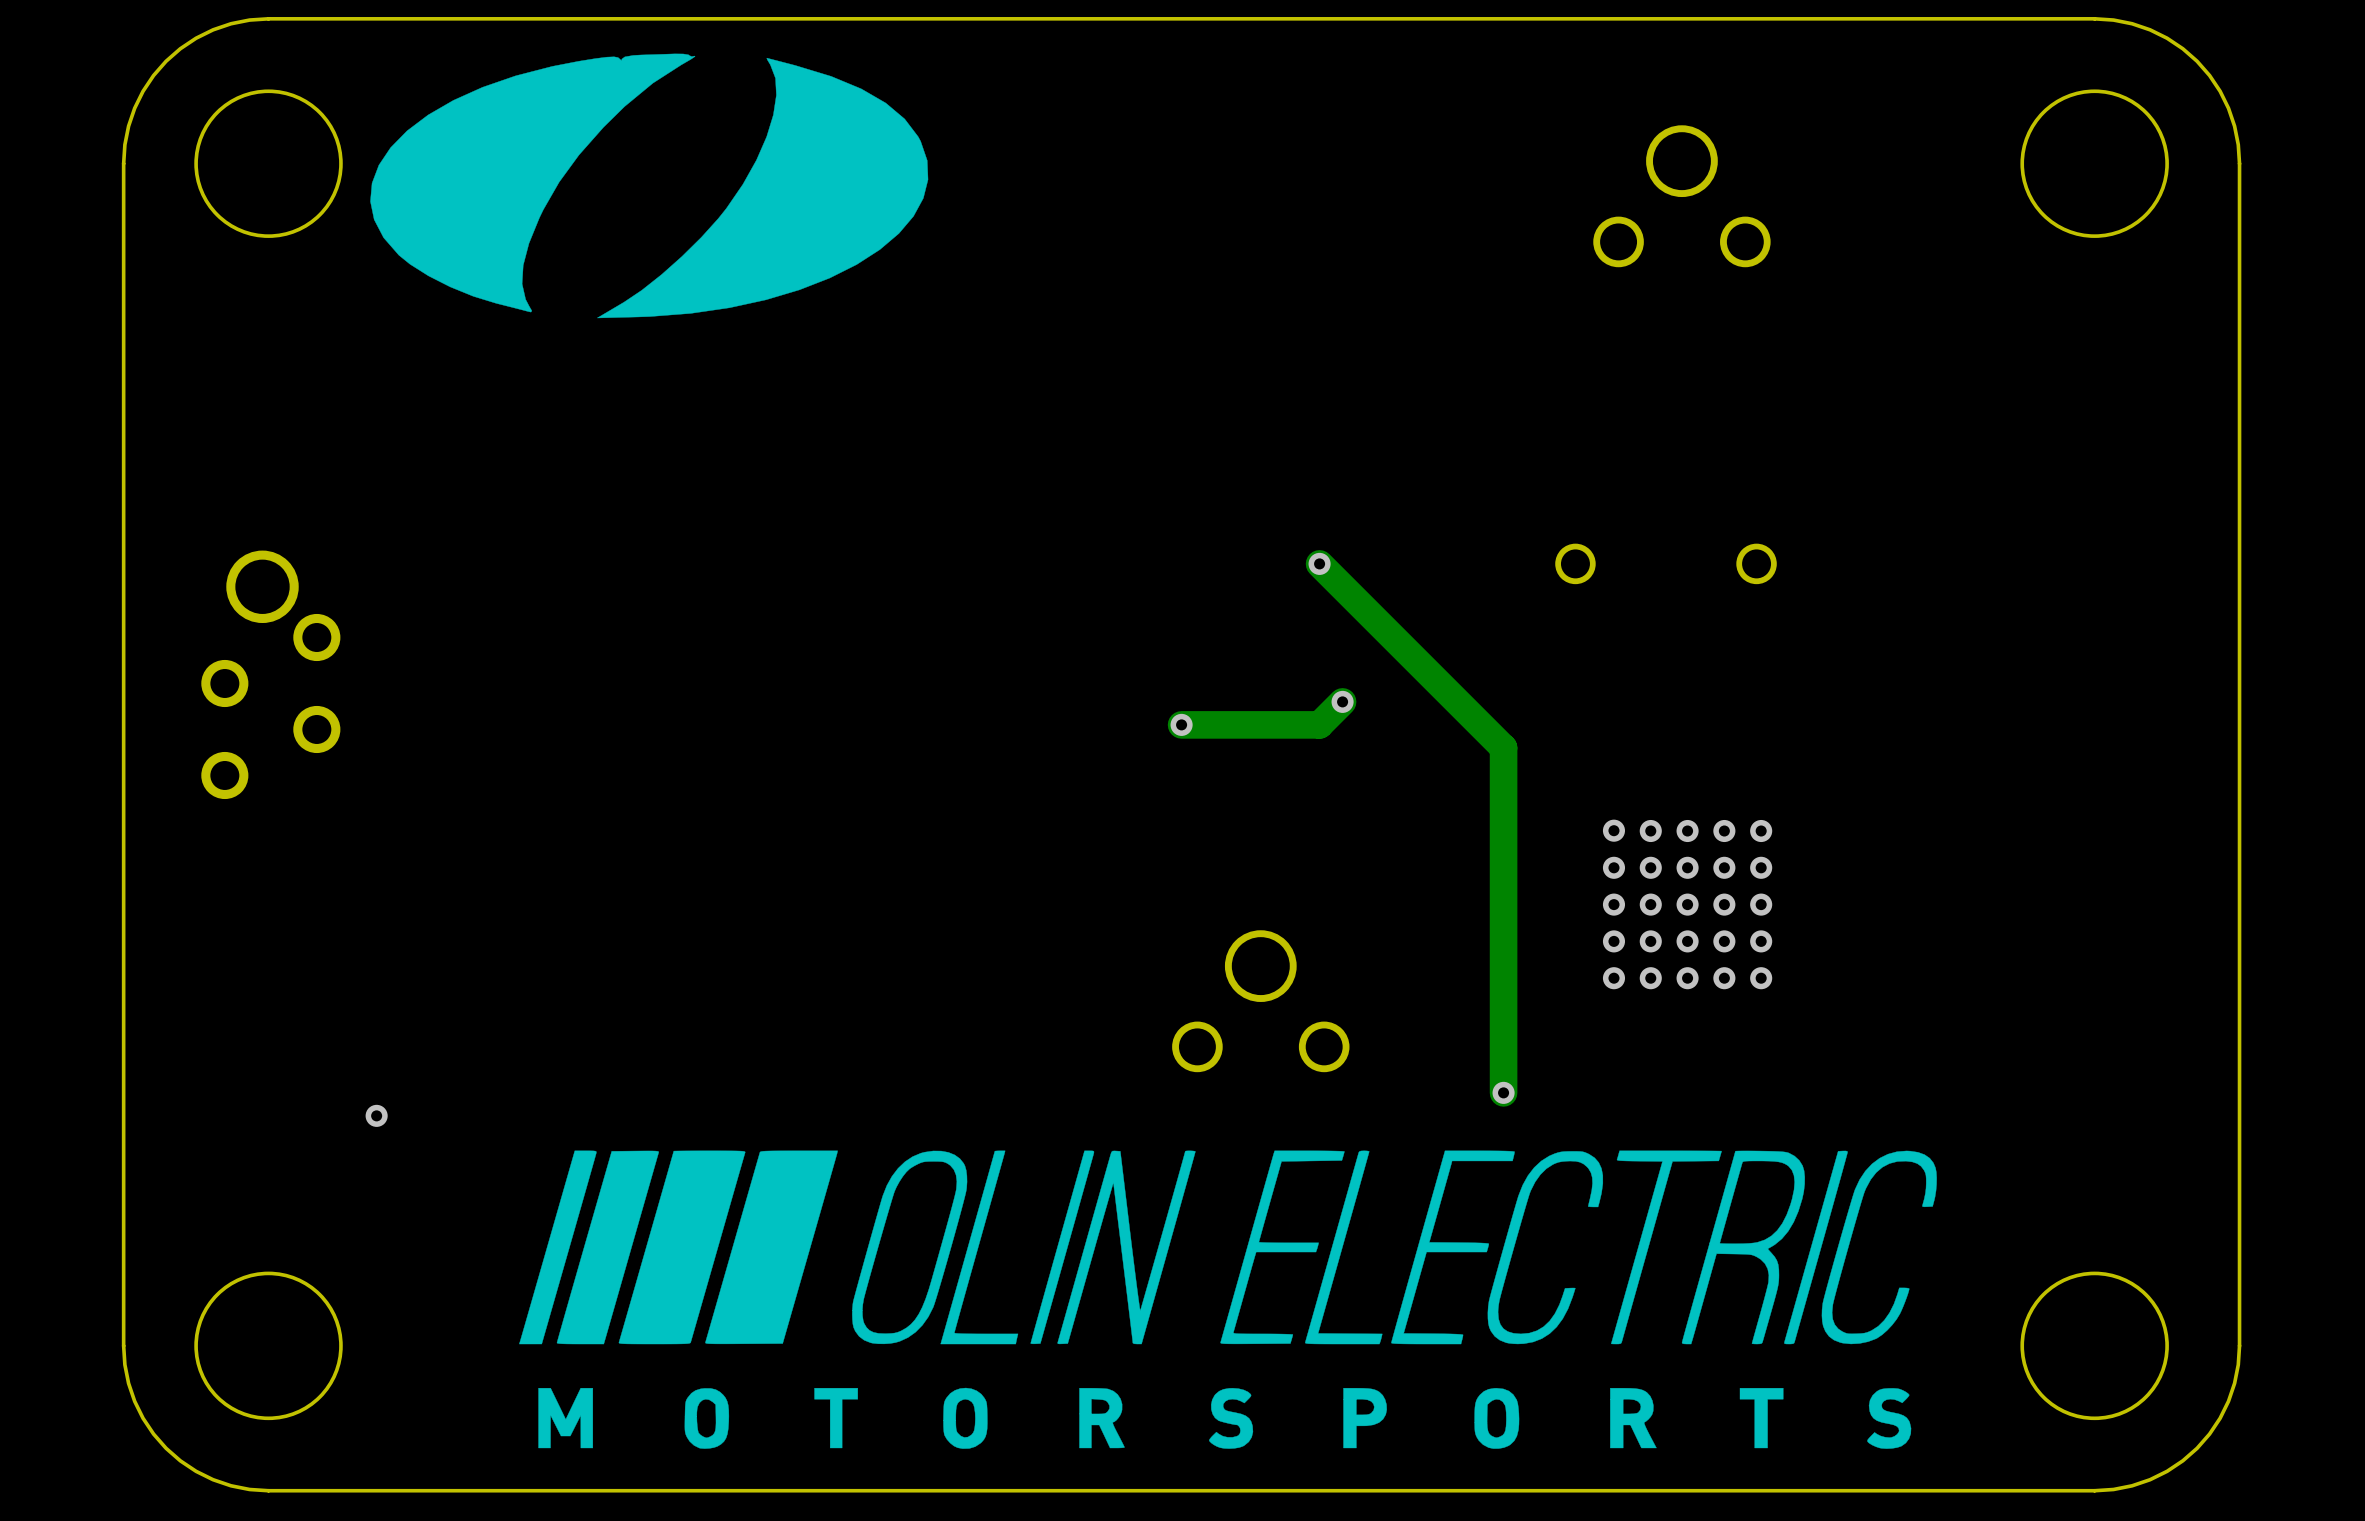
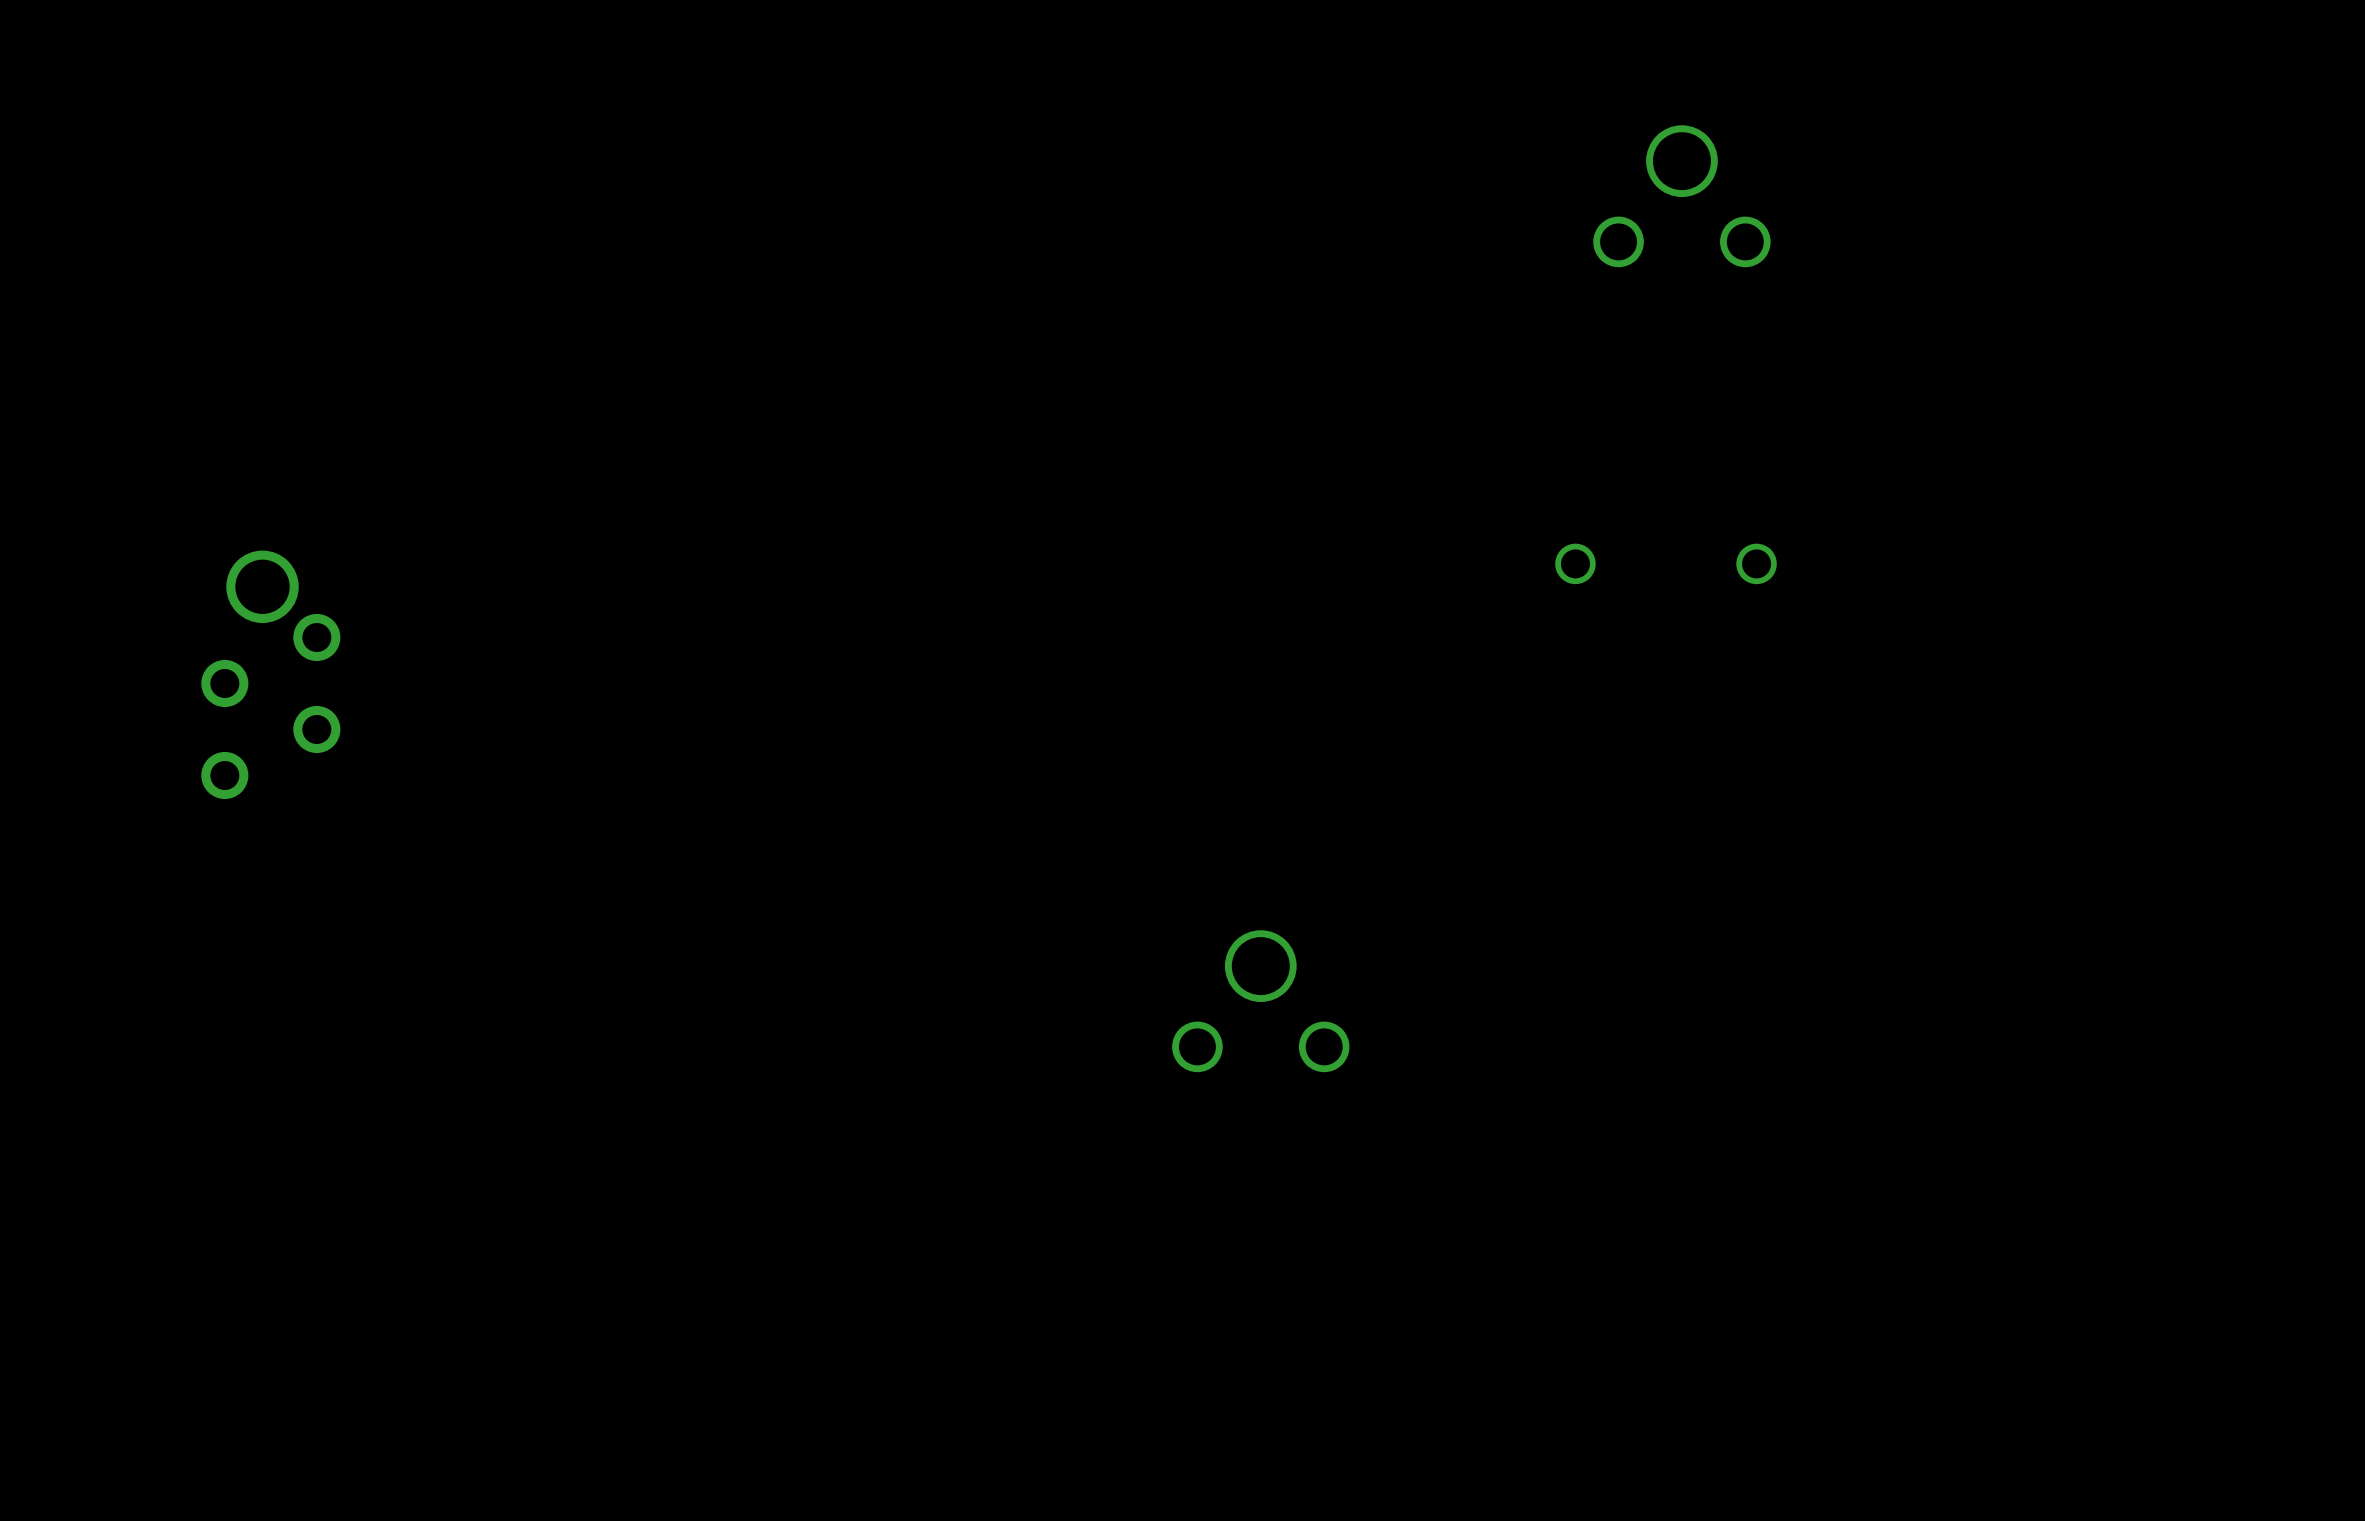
board edge: (2094, 18) (268, 18) (249, 20) (213, 29) (180, 48) (153, 75) (134, 108) (128, 126) (123, 163) (123, 1345) (128, 1383) (143, 1418) (153, 1434) (180, 1460) (213, 1479) (231, 1485) (268, 1490) (2094, 1490) (2132, 1485) (2167, 1471) (2182, 1460) (2209, 1434) (2228, 1401) (2238, 1364) (2239, 1345) (2239, 163) (2238, 144) (2228, 108) (2209, 75) (2197, 61) (2182, 48) (2150, 29) (2113, 20) (2094, 18) -> none
drawing: [370, 53, 929, 319] -> none
round board edge: [194, 89, 343, 238] -> none
round board edge: [2020, 89, 2169, 238] -> none
track: (1319, 563) (1503, 747) (1503, 1092) -> none
via: (1319, 563) -> none
track: (1342, 701) (1319, 724) (1181, 724) -> none
via: (1342, 701) -> none
via: (1181, 724) -> none
via: (1613, 830) -> none
via: (1650, 831) -> none
via: (1687, 831) -> none
via: (1724, 831) -> none
via: (1761, 831) -> none
via: (1613, 867) -> none
via: (1650, 867) -> none
via: (1687, 867) -> none
via: (1724, 867) -> none
via: (1761, 867) -> none
via: (1613, 904) -> none
via: (1650, 904) -> none
via: (1687, 904) -> none
via: (1724, 904) -> none
via: (1761, 904) -> none
via: (1613, 941) -> none
via: (1650, 941) -> none
via: (1687, 941) -> none
via: (1724, 941) -> none
via: (1761, 941) -> none
via: (1613, 978) -> none
via: (1650, 978) -> none
via: (1687, 978) -> none
via: (1724, 978) -> none
via: (1761, 978) -> none
via: (1503, 1092) -> none
via: (376, 1115) -> none
drawing: [519, 1150, 1937, 1449] -> none
round board edge: [194, 1271, 343, 1421] -> none
round board edge: [2020, 1271, 2169, 1421] -> none

